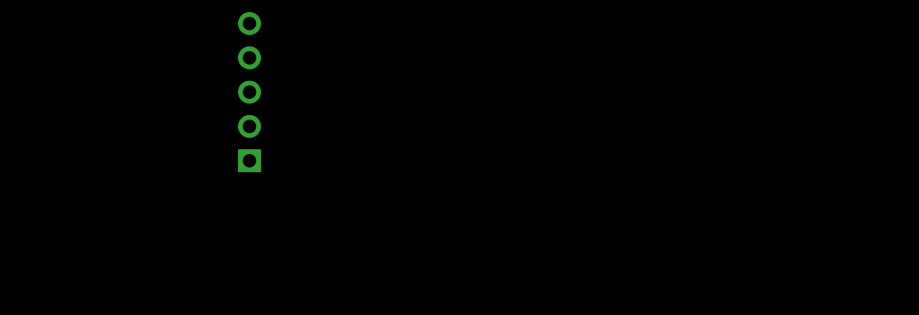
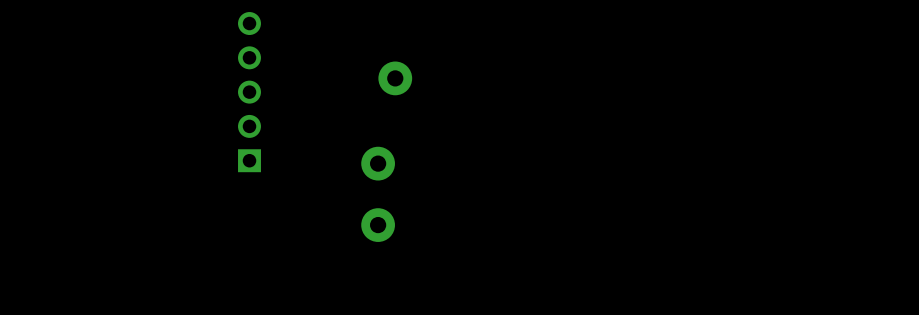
part: none -> (395, 78)
part: none -> (378, 163)
part: none -> (378, 225)

